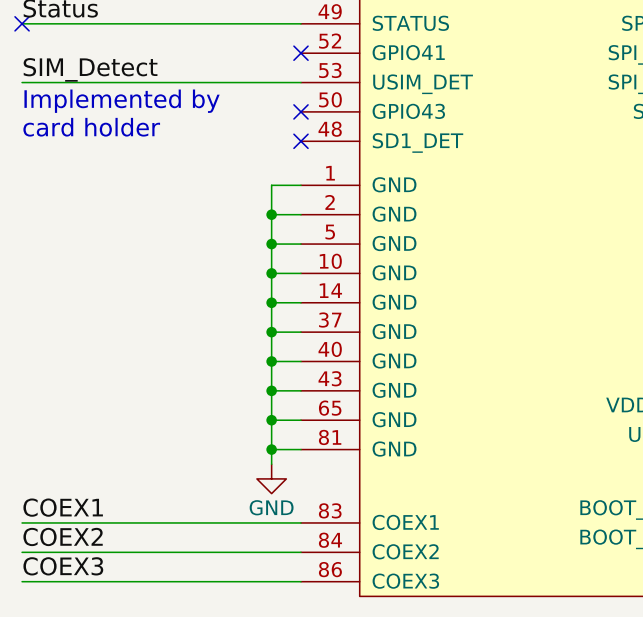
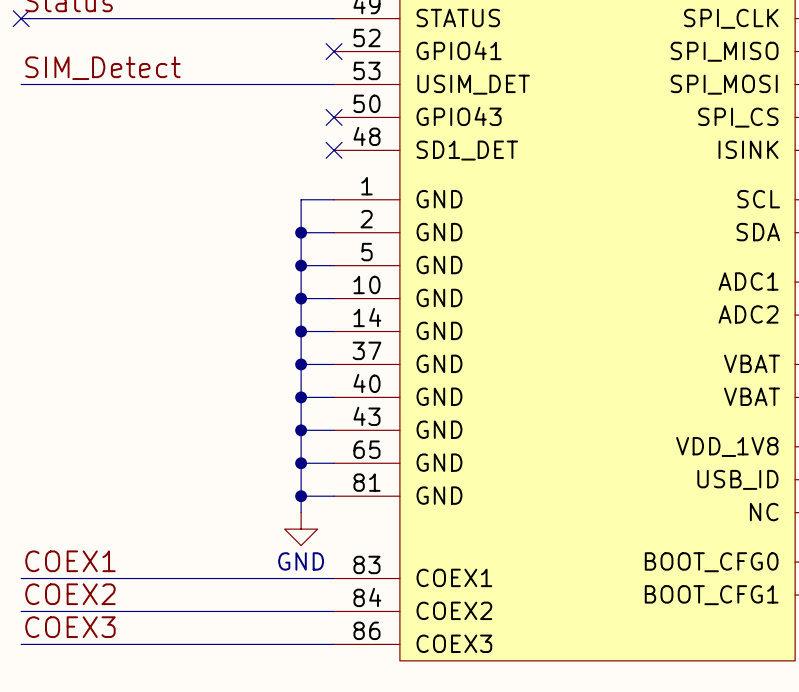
text: Implemented by (122, 101) -> none
text: card holder (91, 127) -> none

